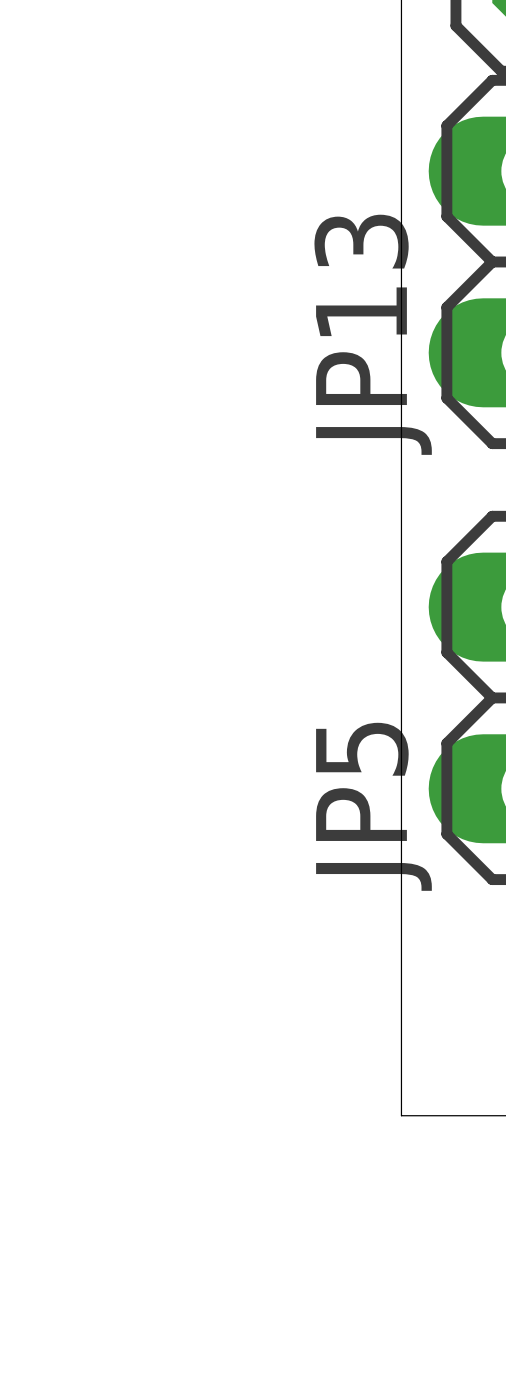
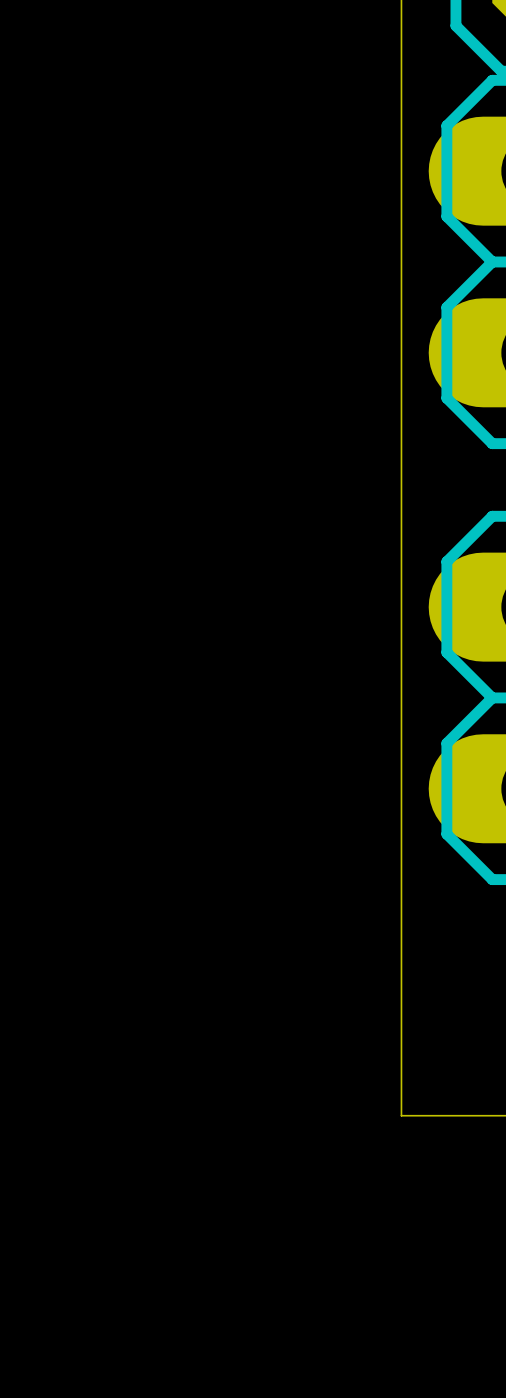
JP13 name: JP13 (373, 334) -> none
JP5 name: JP5 (373, 806) -> none

